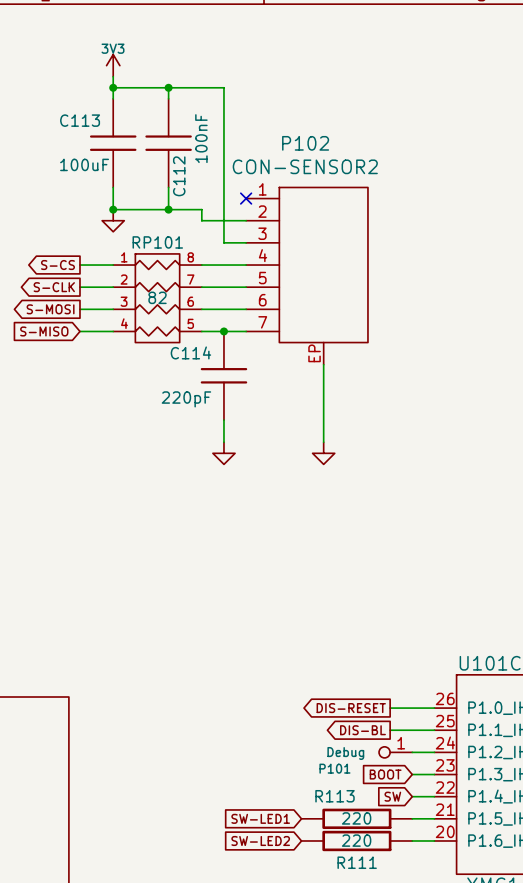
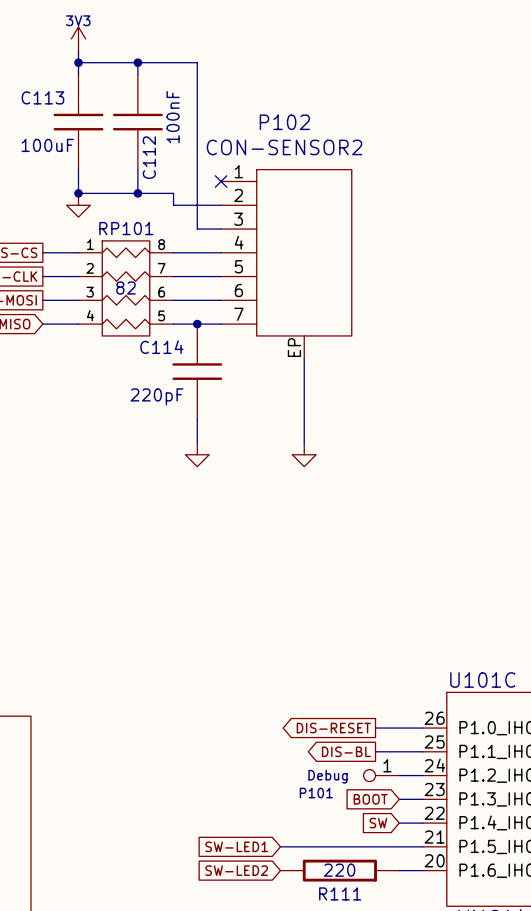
wire: none -> (280, 846) (399, 846)
R113: 220 (356, 818) -> none

